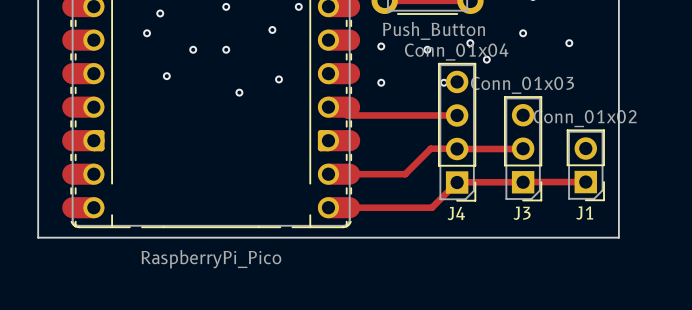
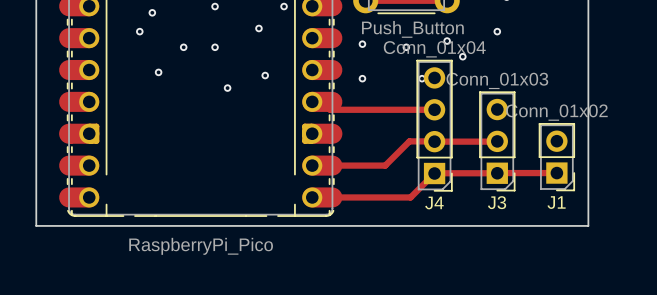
via: (569, 43) -> none

